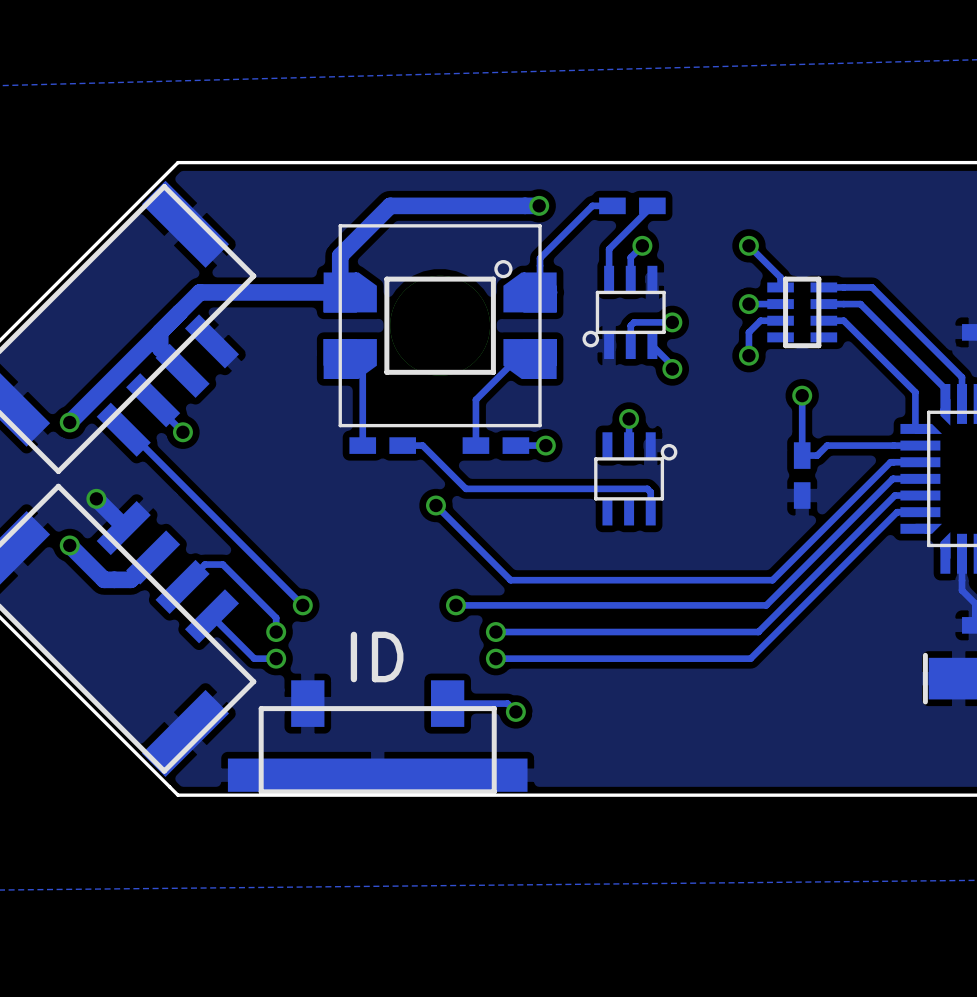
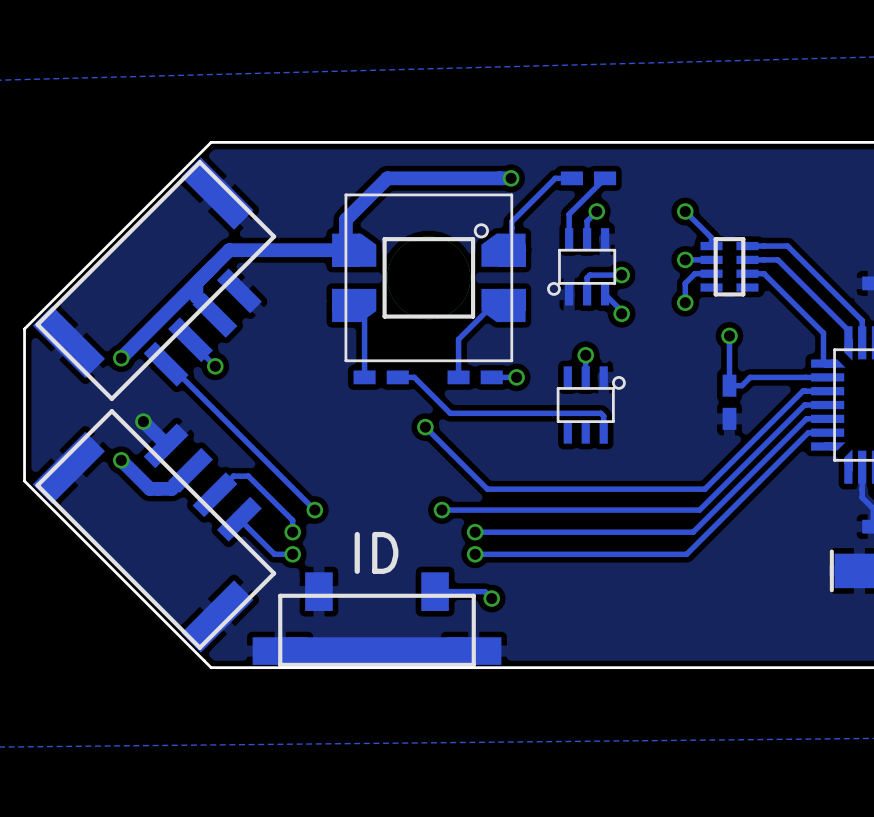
part footprint: [227, 680, 528, 795] -> [252, 572, 502, 667]
track: none -> (473, 651) (280, 651)

